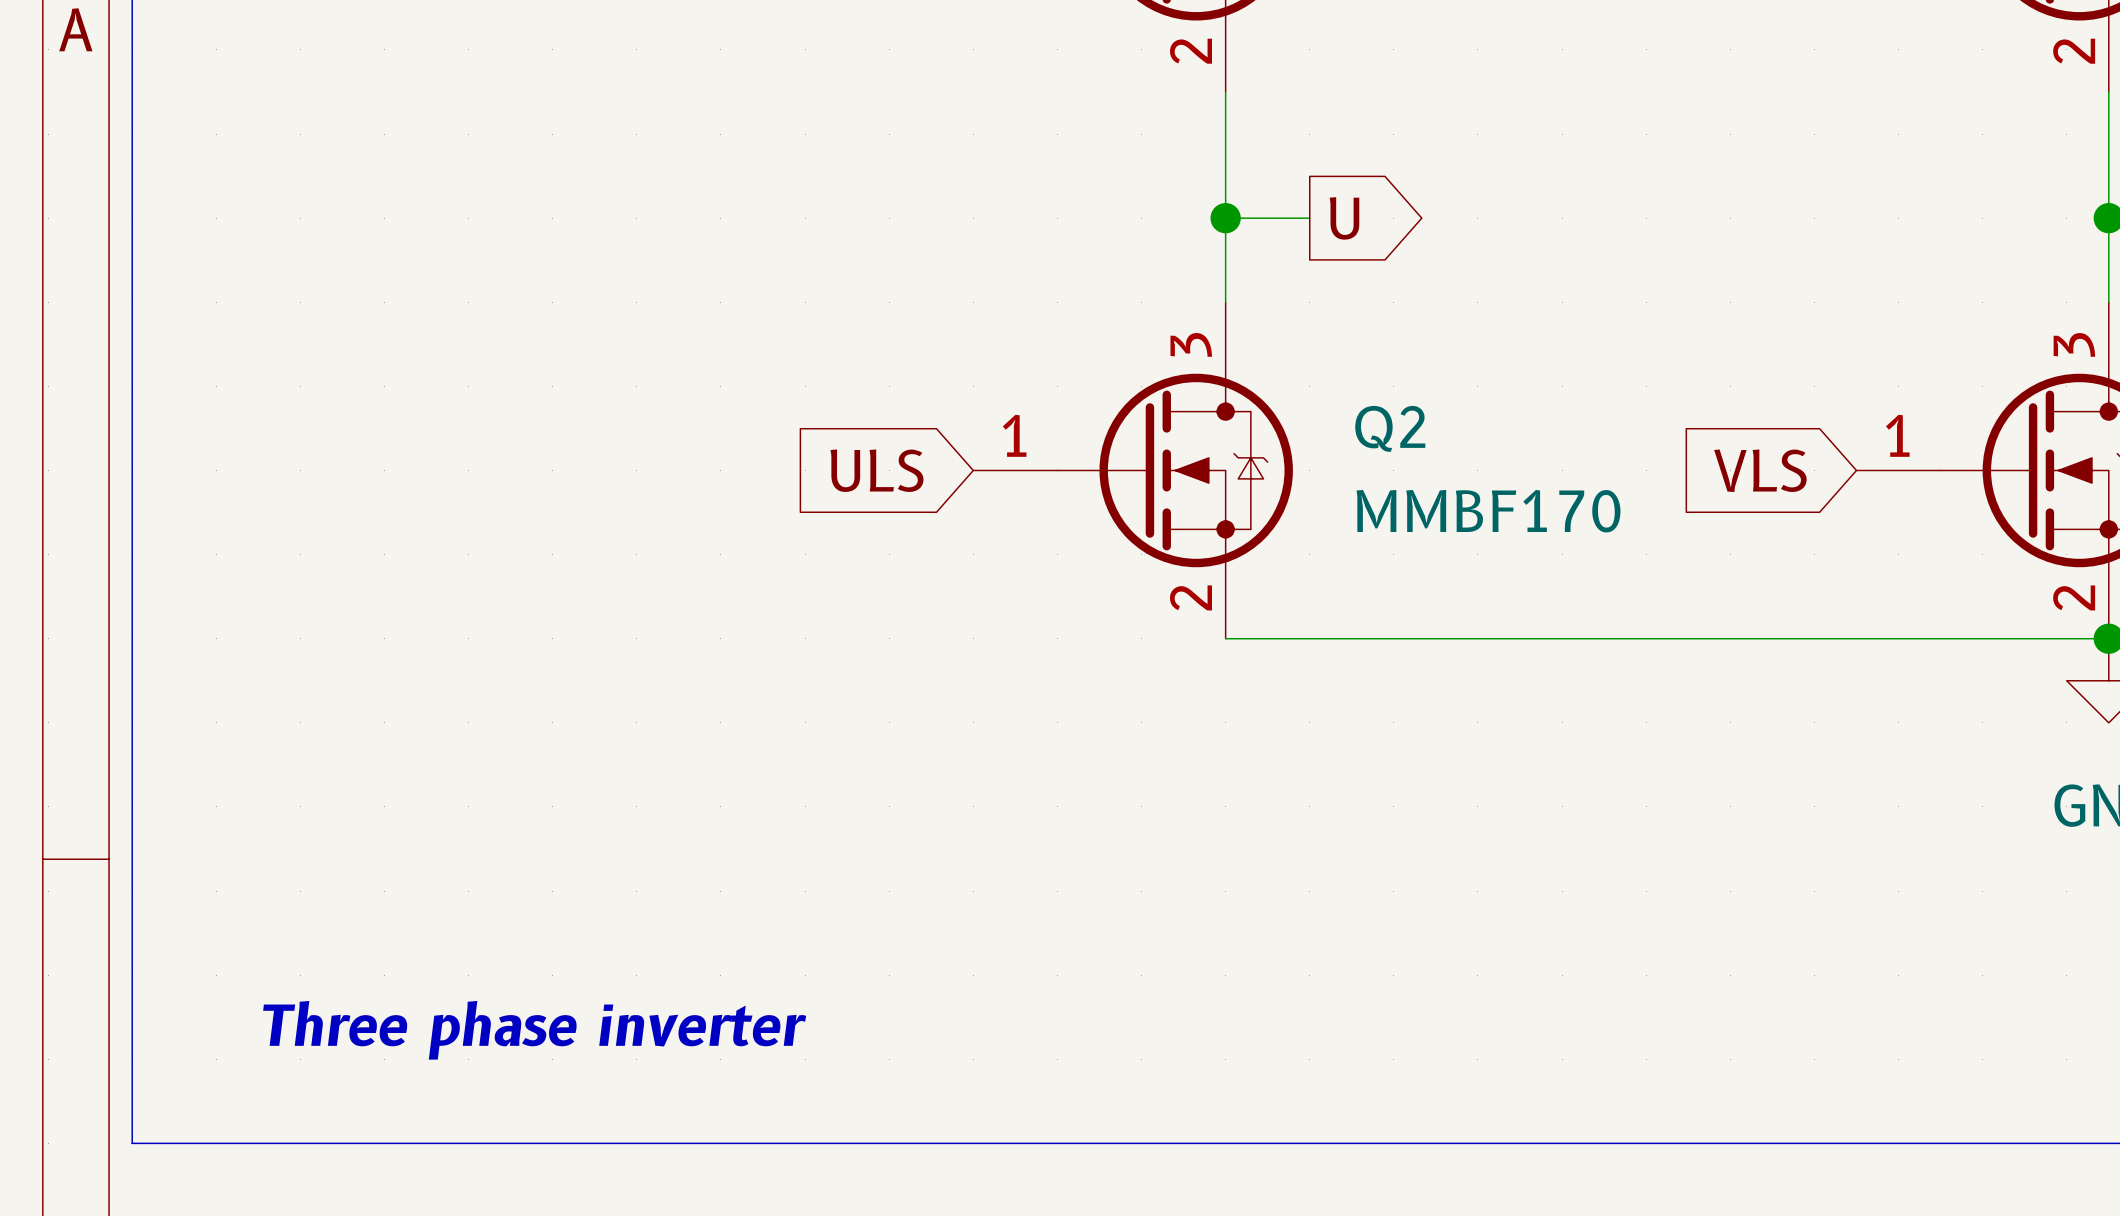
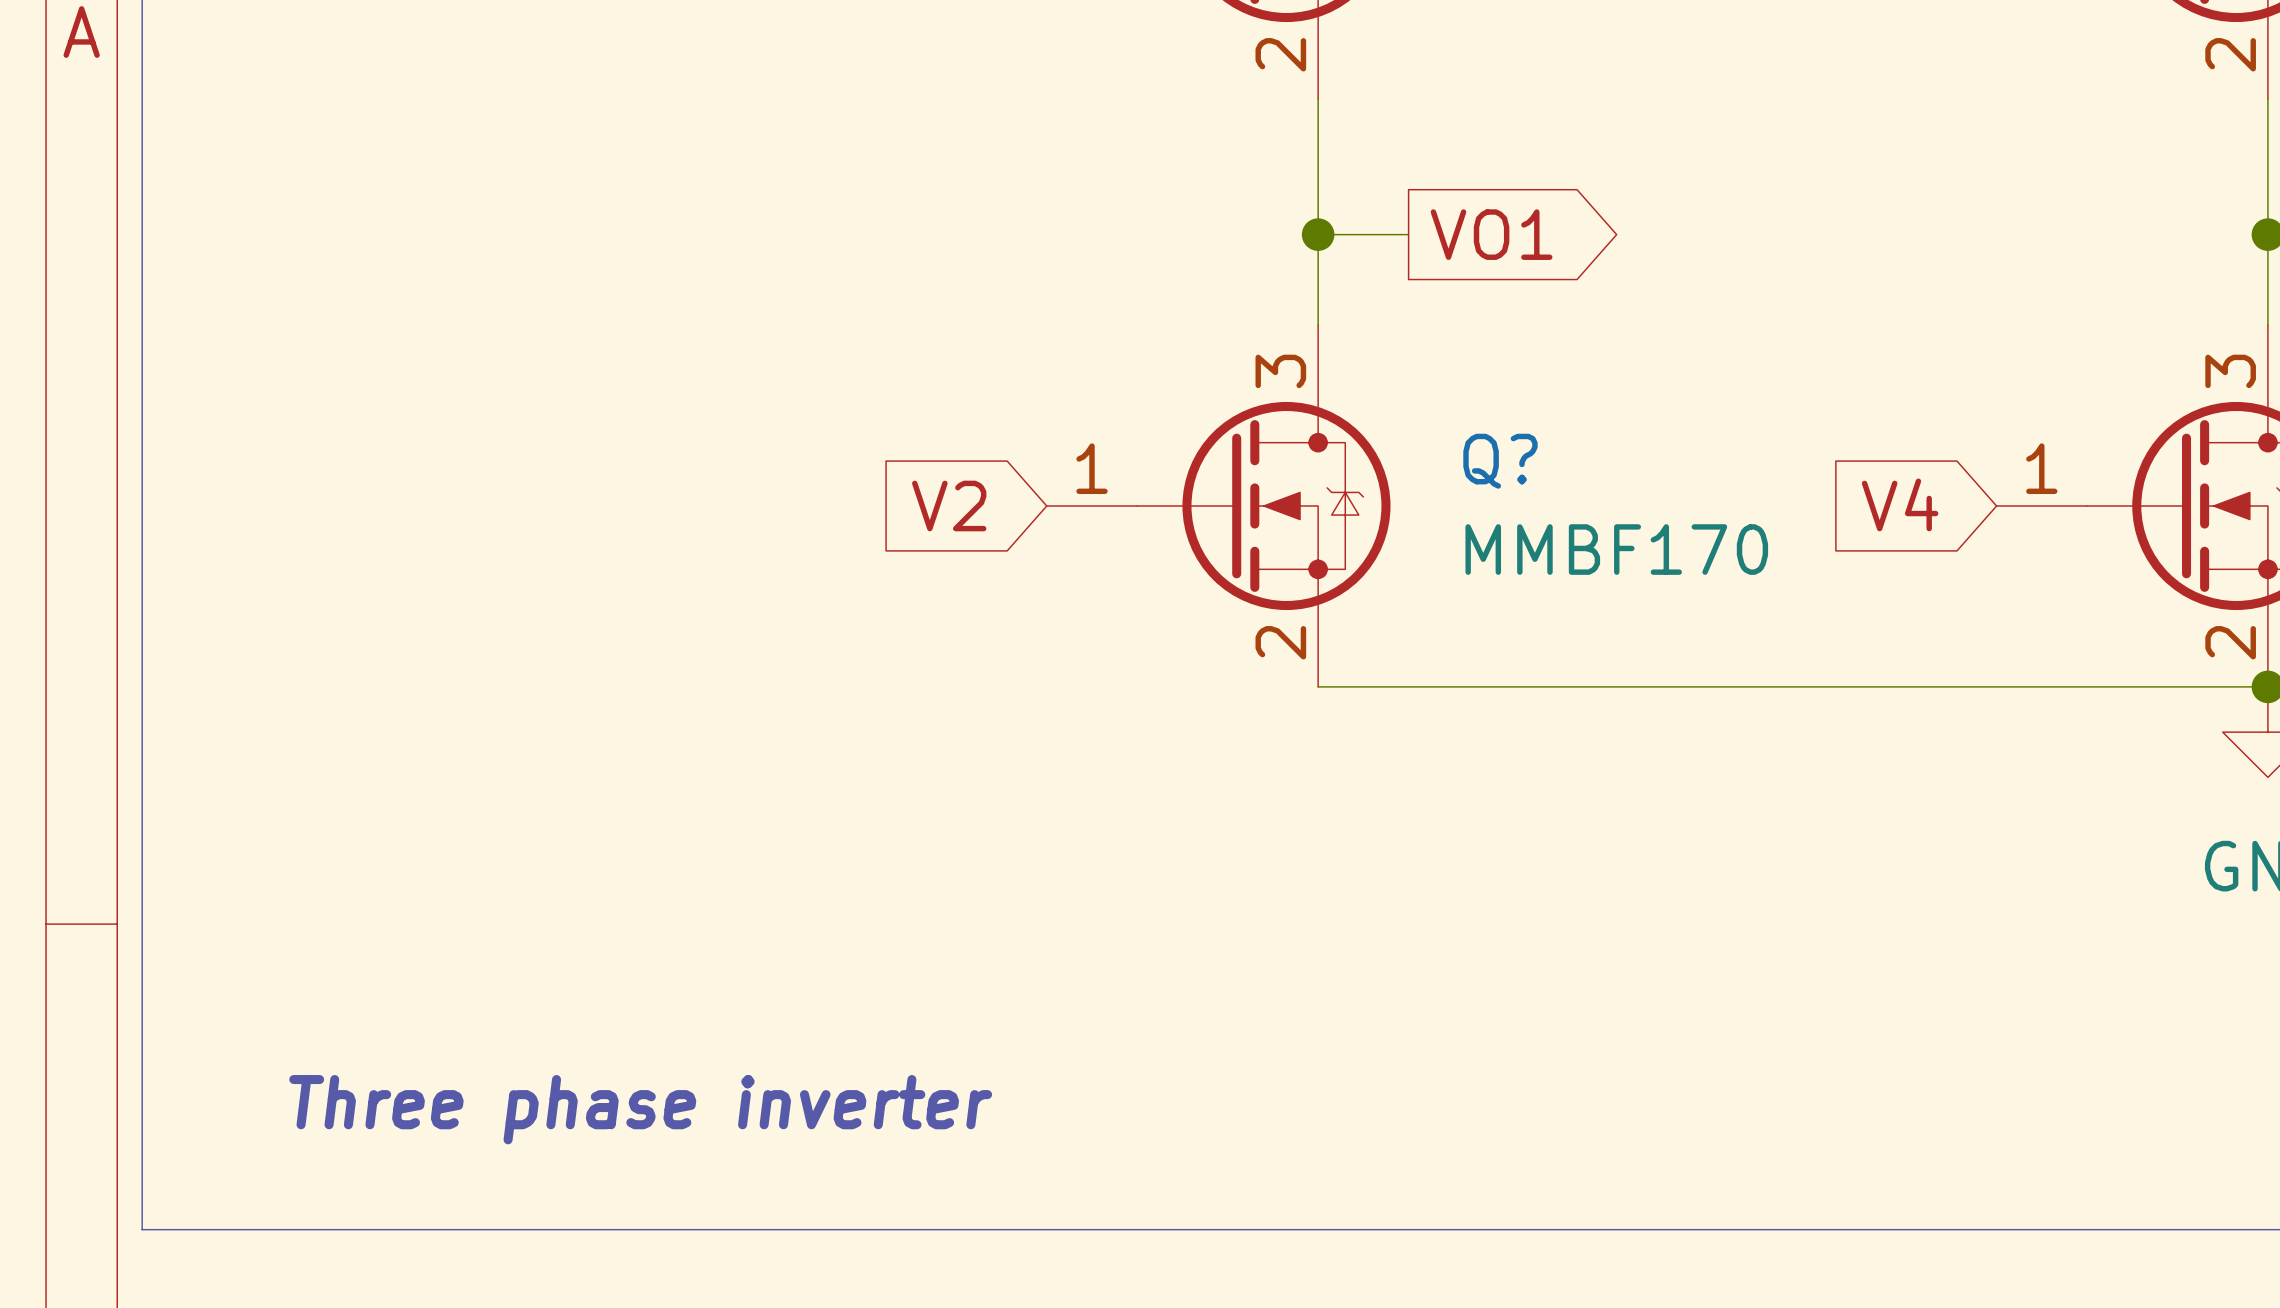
global label: U (1344, 218) -> VO1 (1491, 234)
Q2 name: Q2 (1390, 428) -> Q? (1500, 461)
global label: ULS (877, 470) -> V2 (949, 506)
global label: VLS (1760, 470) -> V4 (1900, 504)

